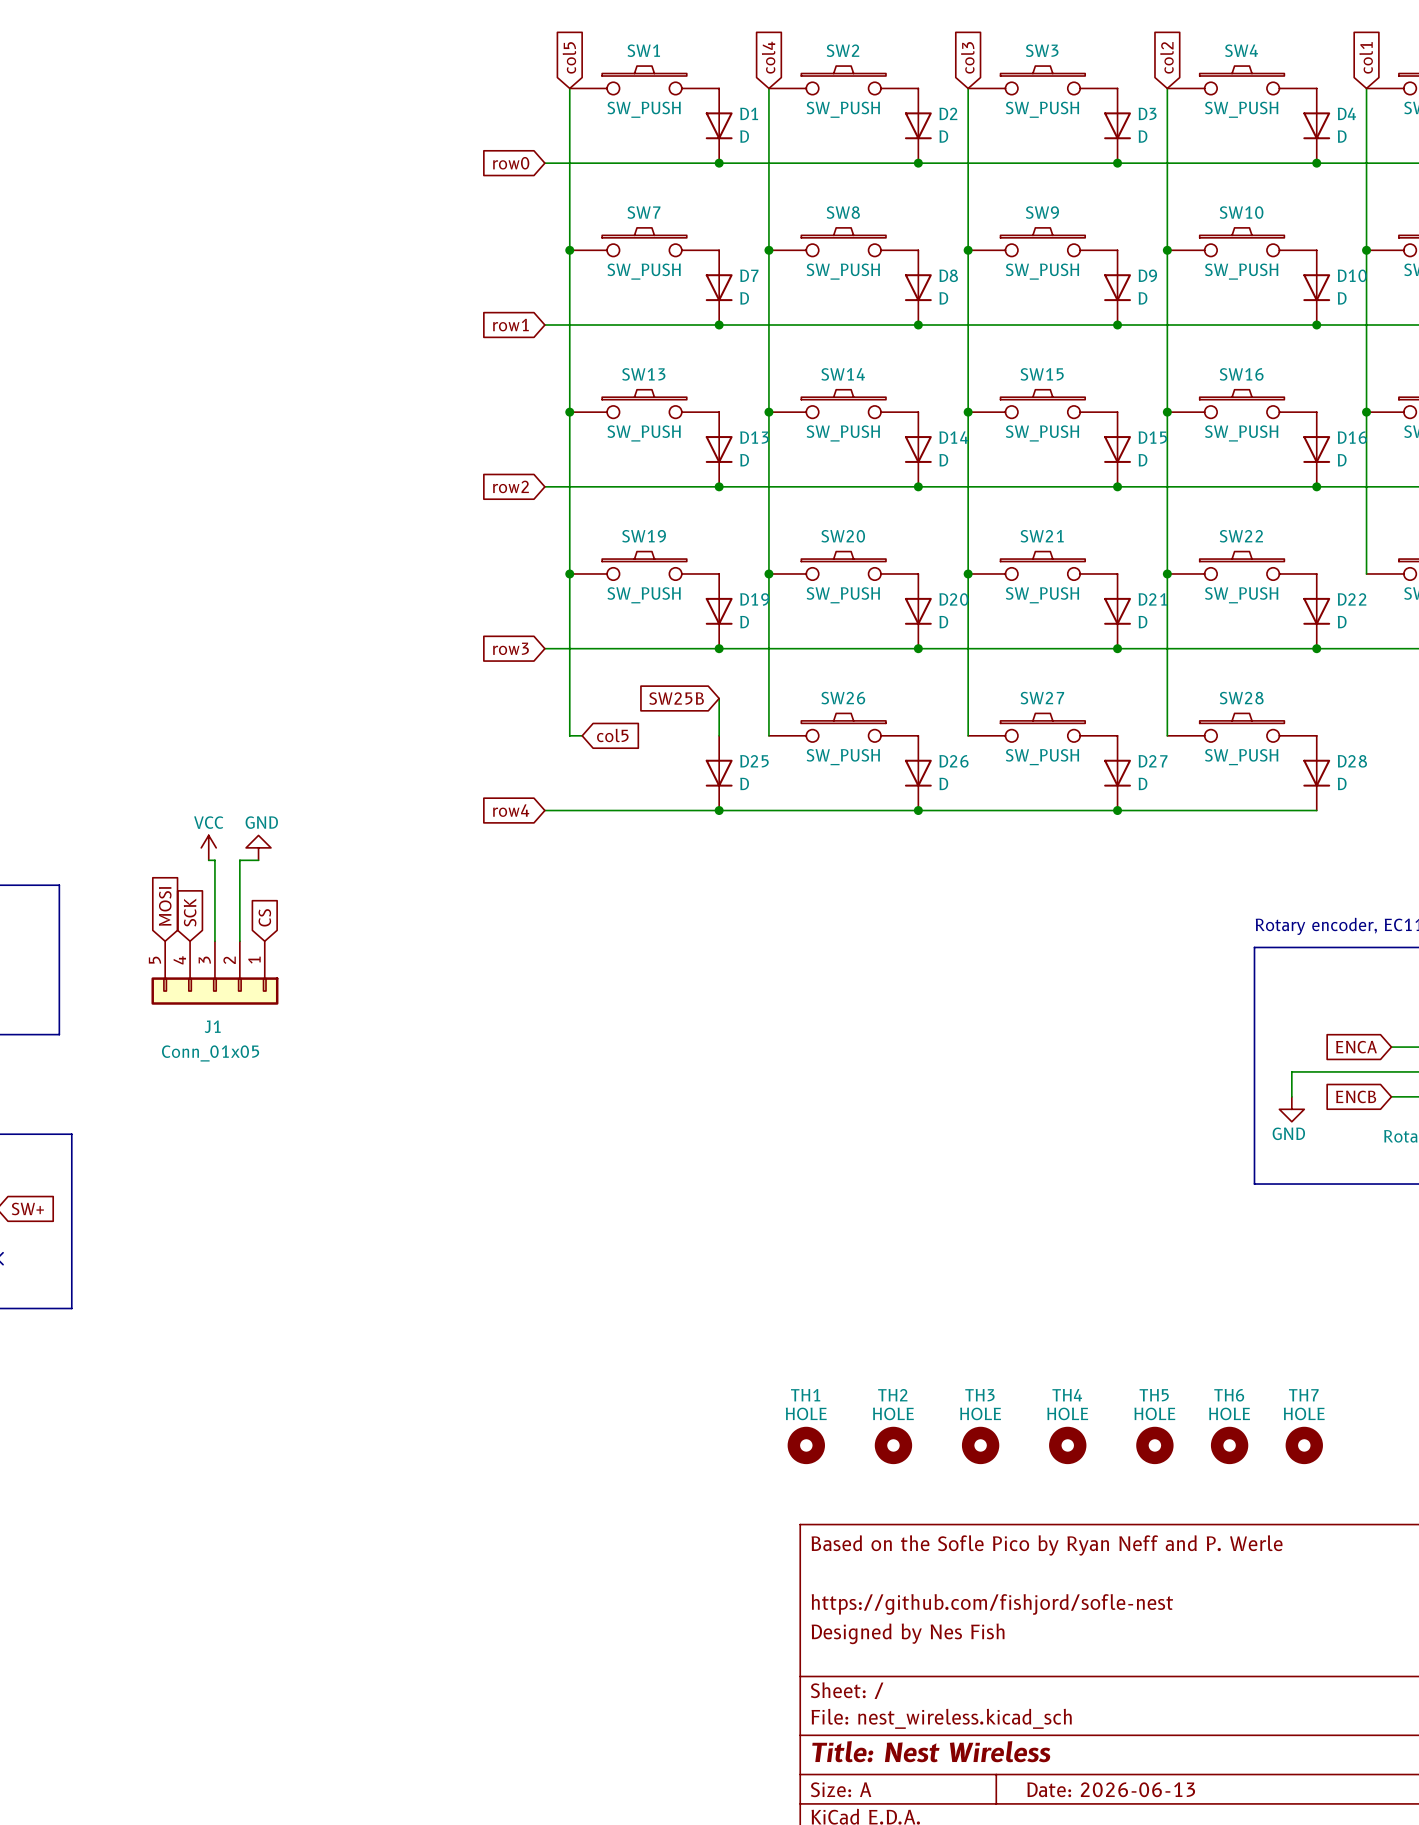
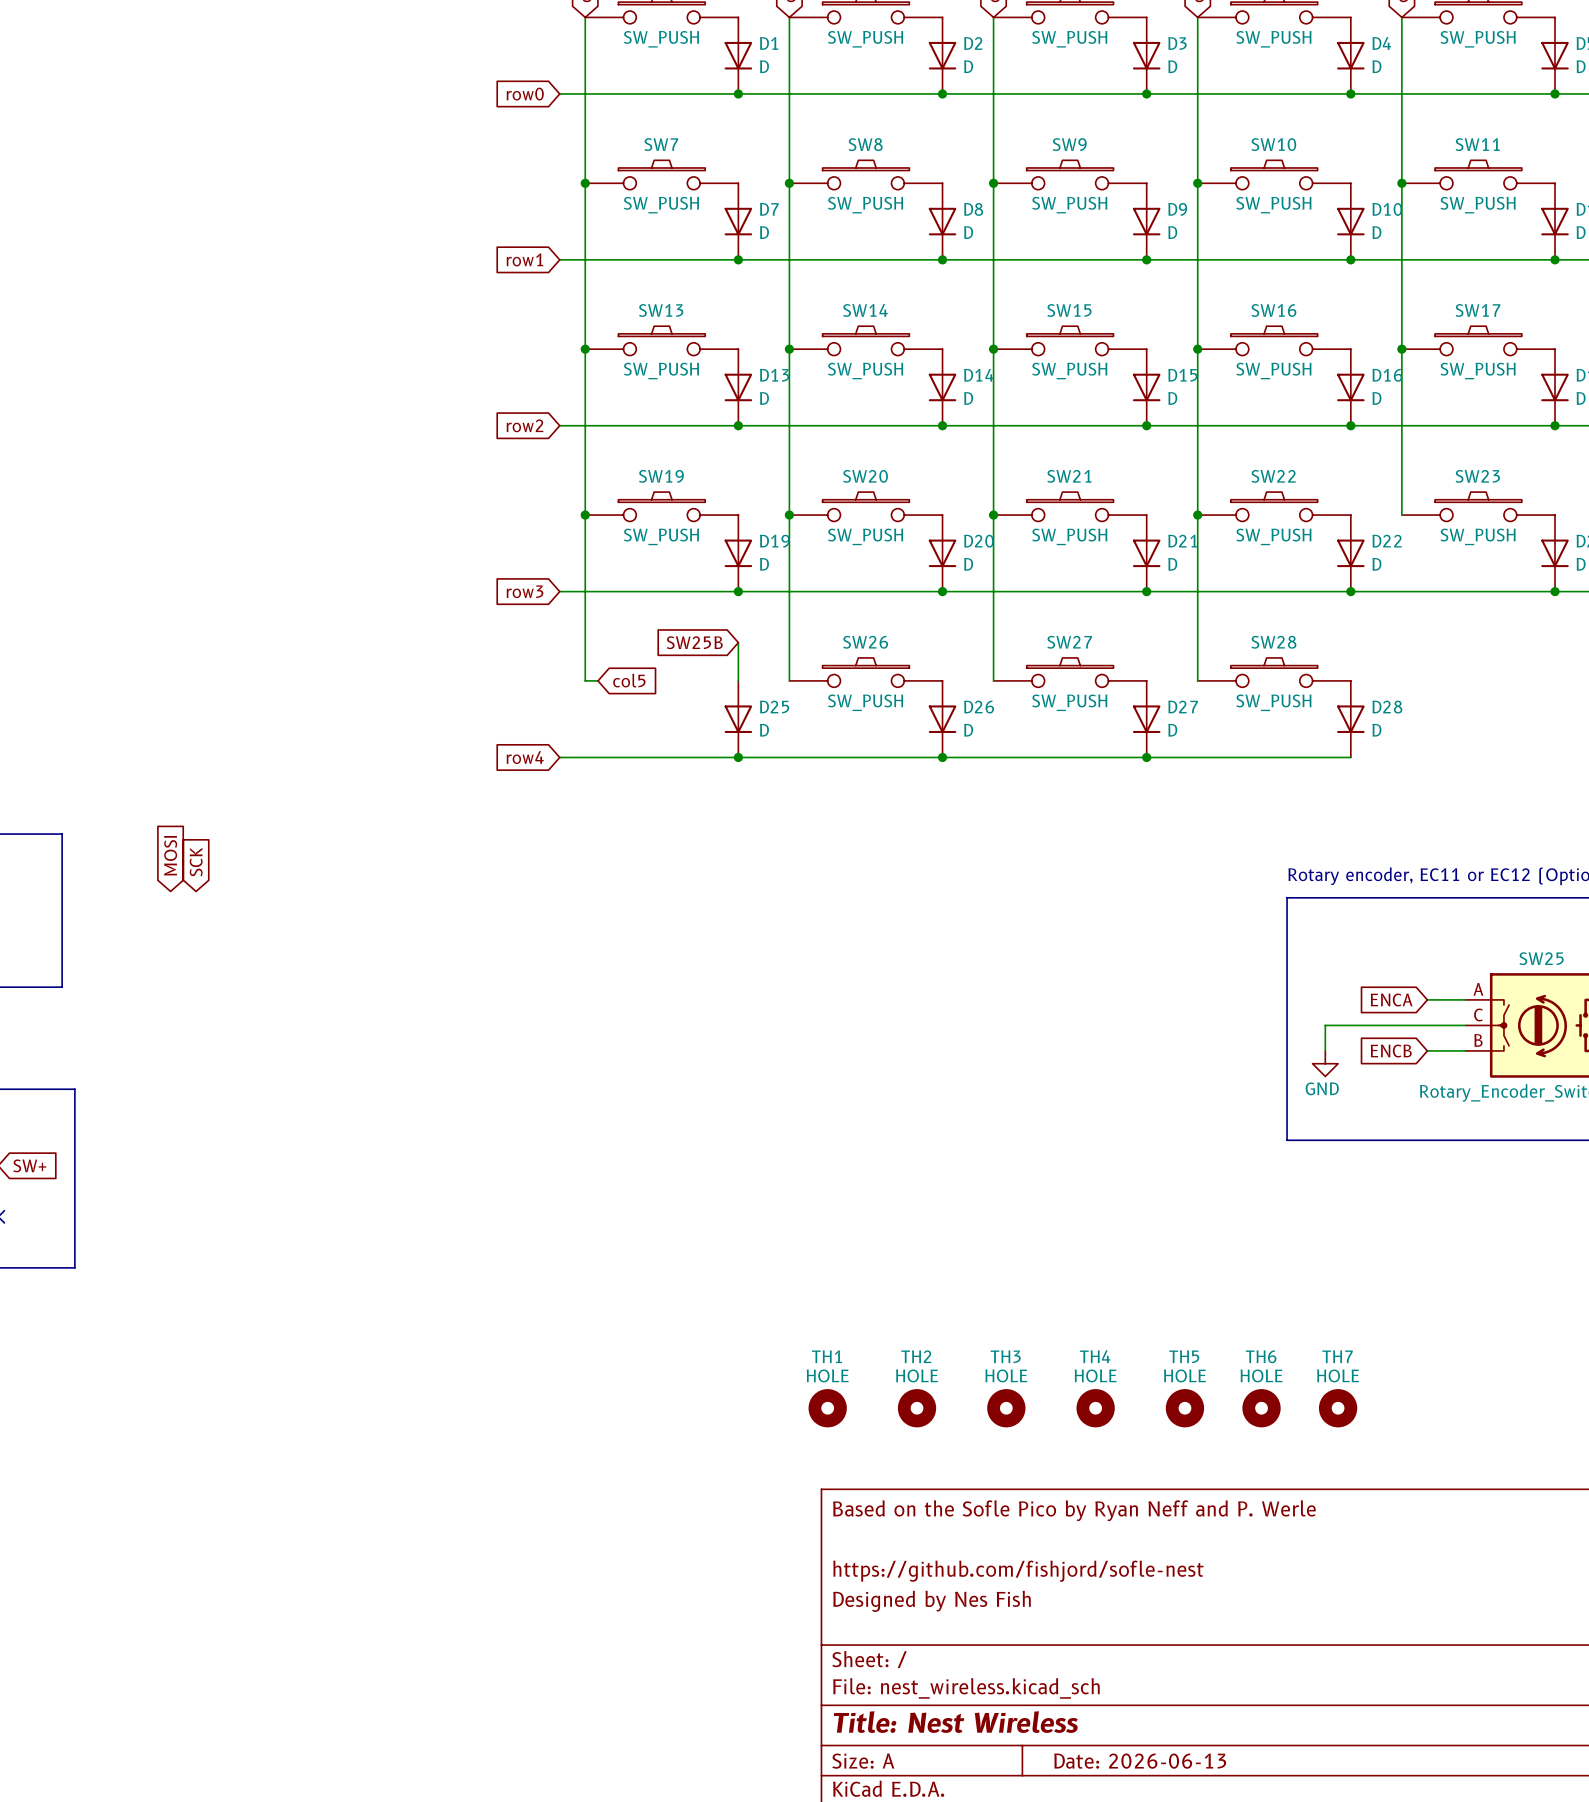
power symbol: VCC (208, 847) -> none
power symbol: GND (258, 847) -> none
wire: (208, 860) (214, 860) (214, 941) -> none
wire: (258, 860) (239, 860) (239, 941) -> none
global label: CS (264, 917) -> none
J1: Conn_01x05 (214, 972) -> none

